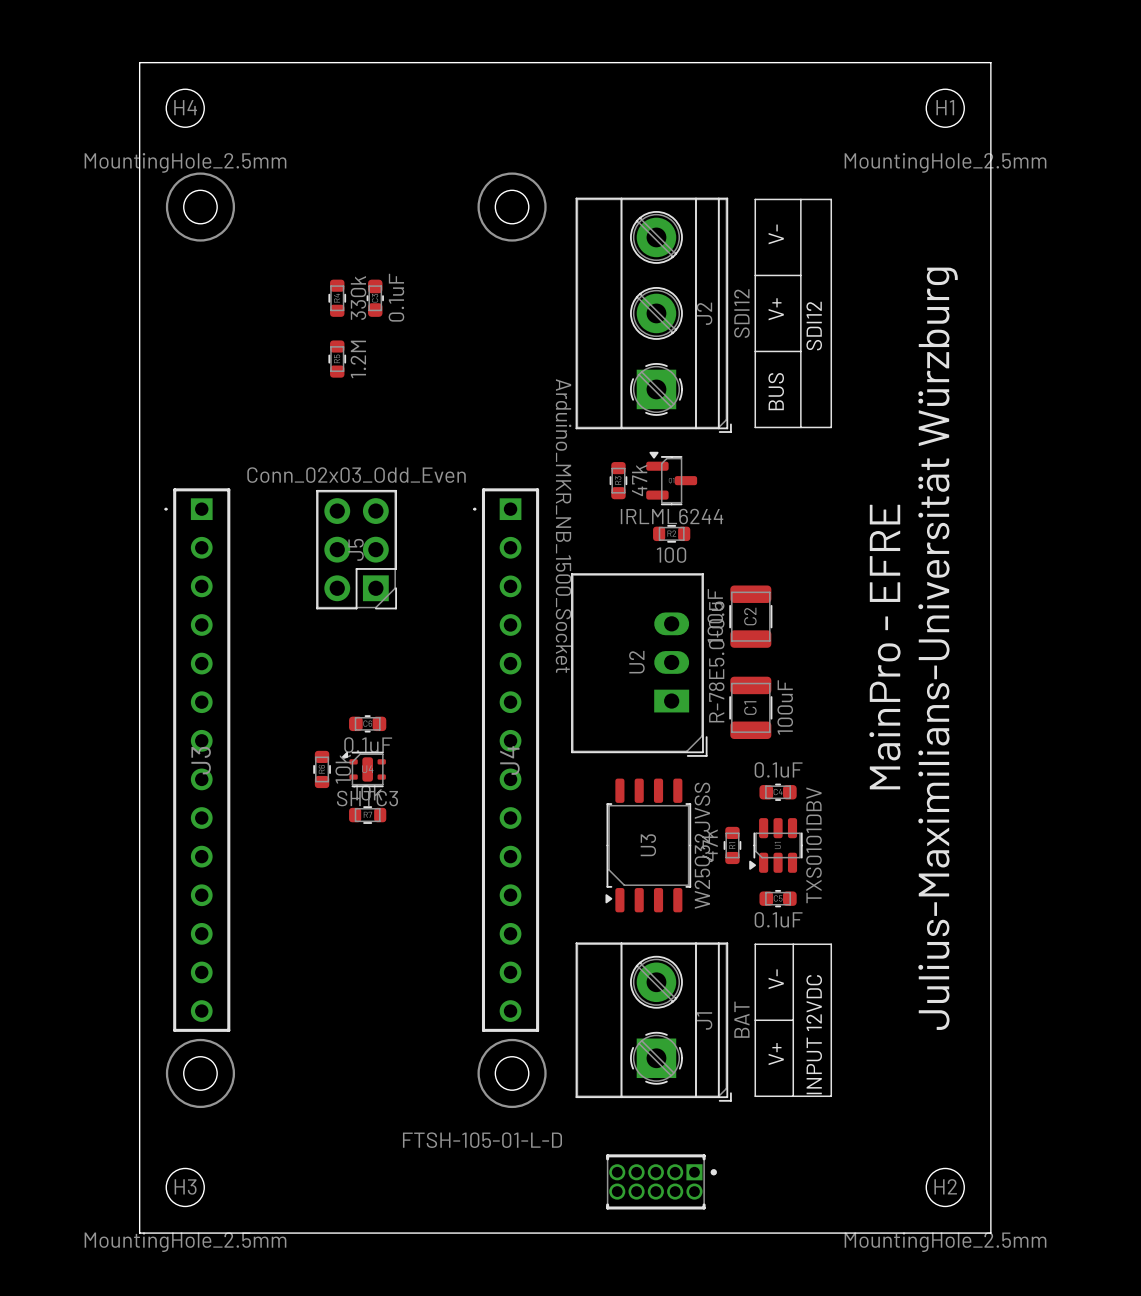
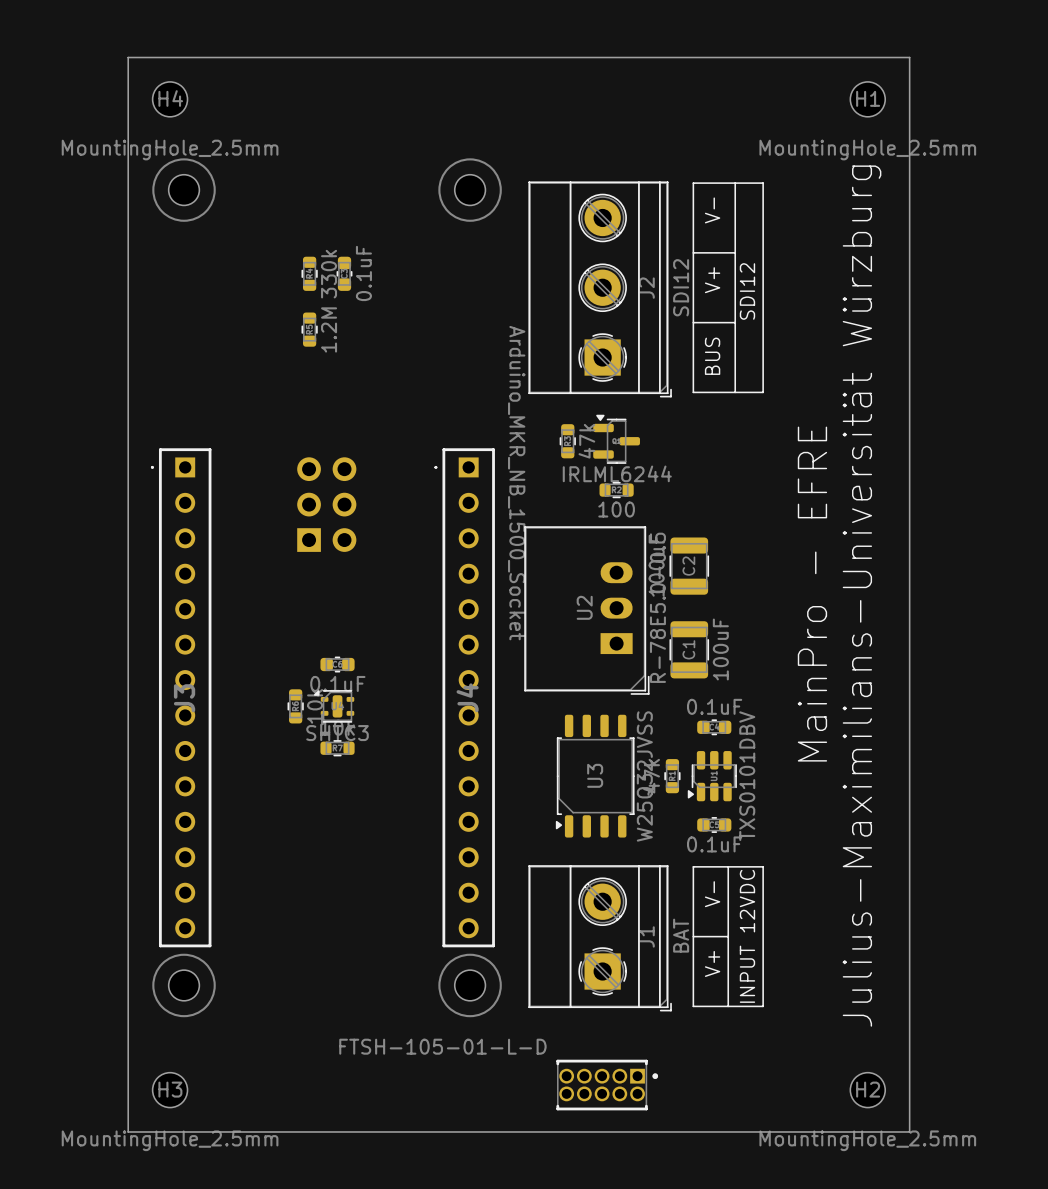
J5 side: top (356, 549) -> bottom (326, 504)

